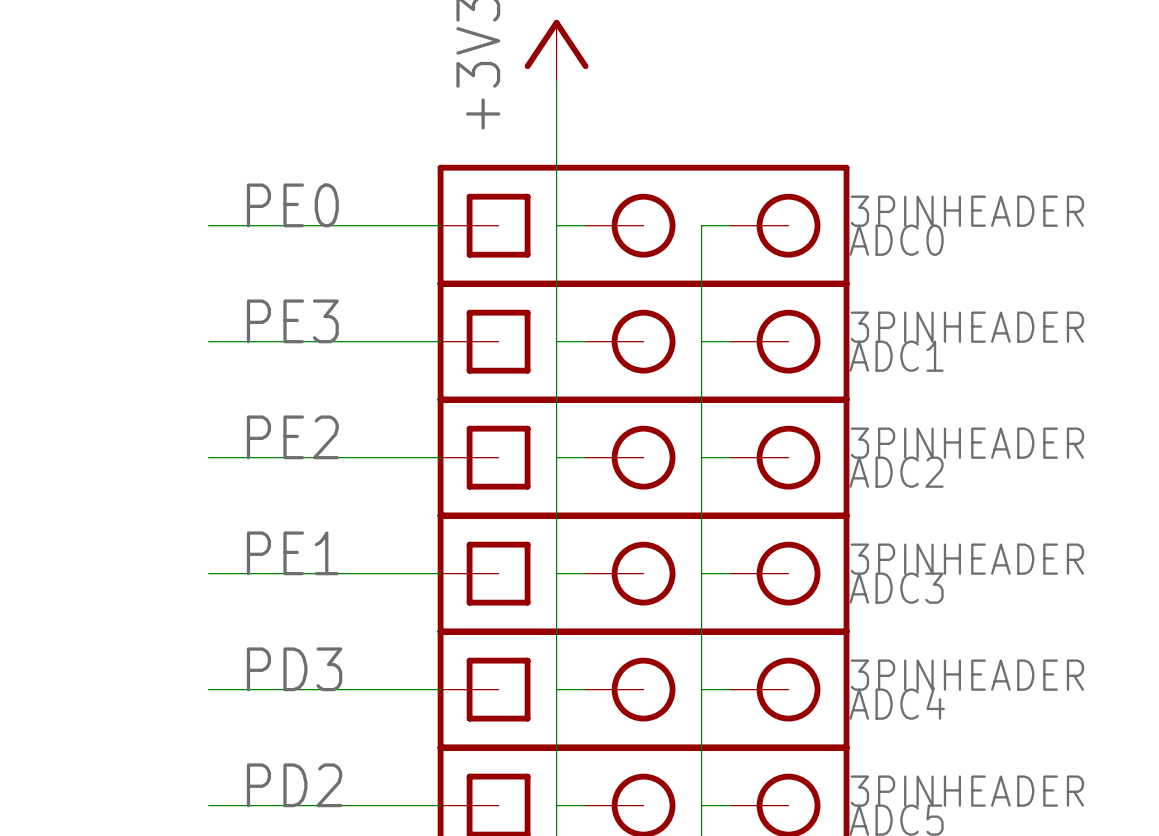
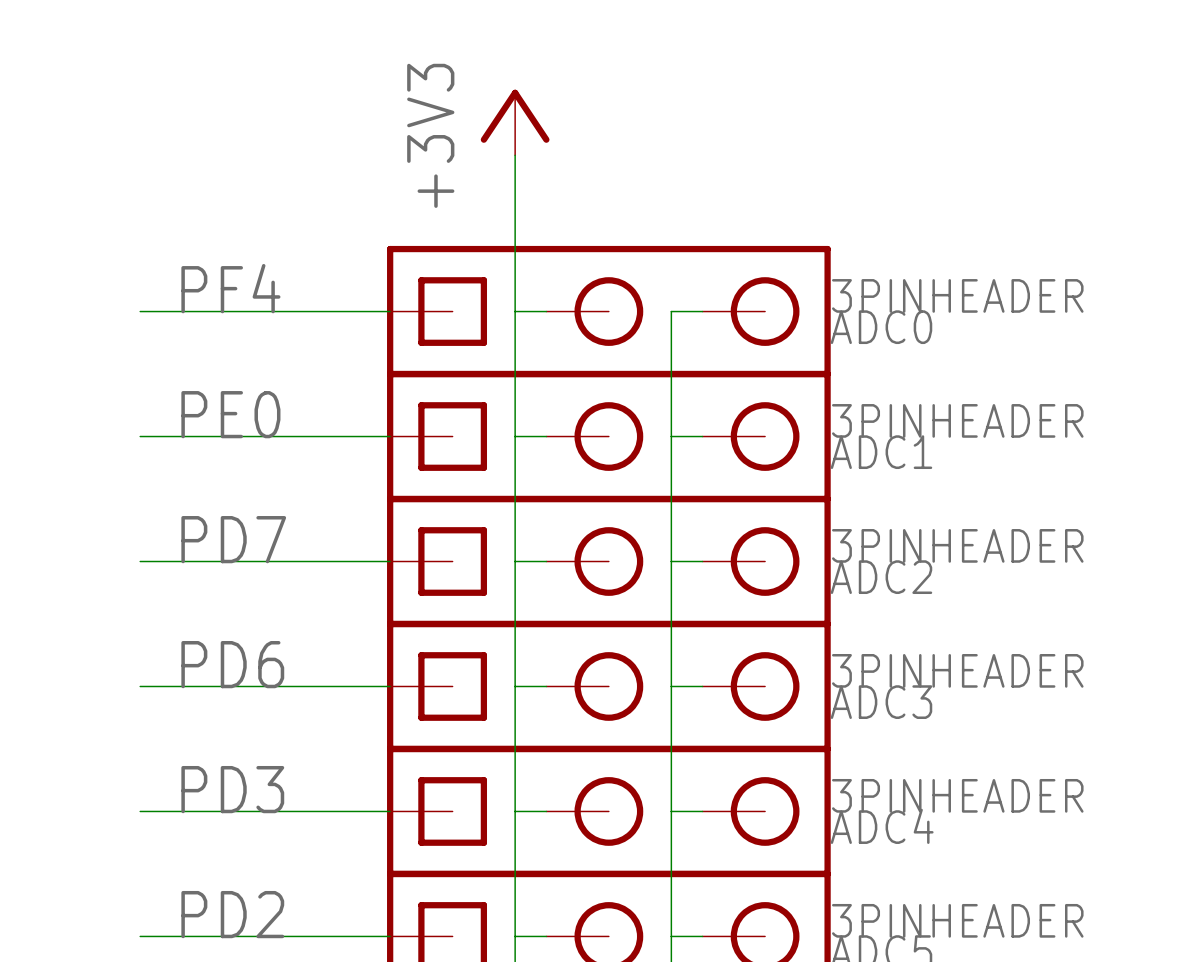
label: PE0 (292, 205) -> PF4 (230, 288)
label: PE3 (292, 321) -> PE0 (230, 414)
label: PE2 (292, 437) -> PD7 (233, 539)
label: PE1 (292, 553) -> PD6 (232, 664)

